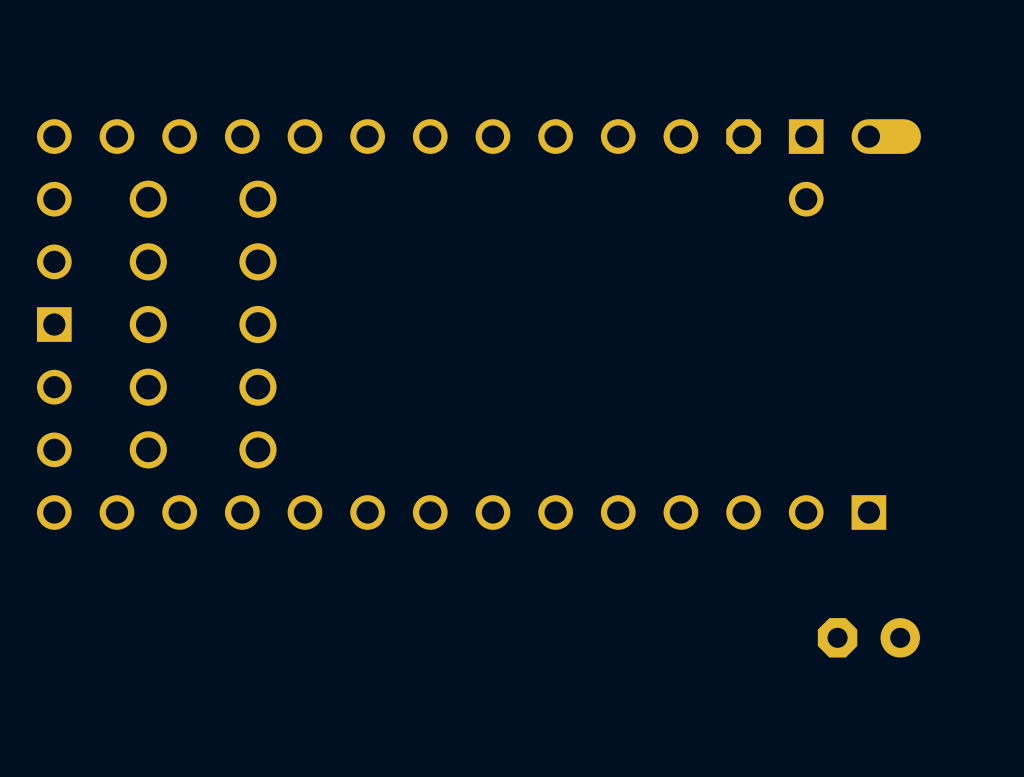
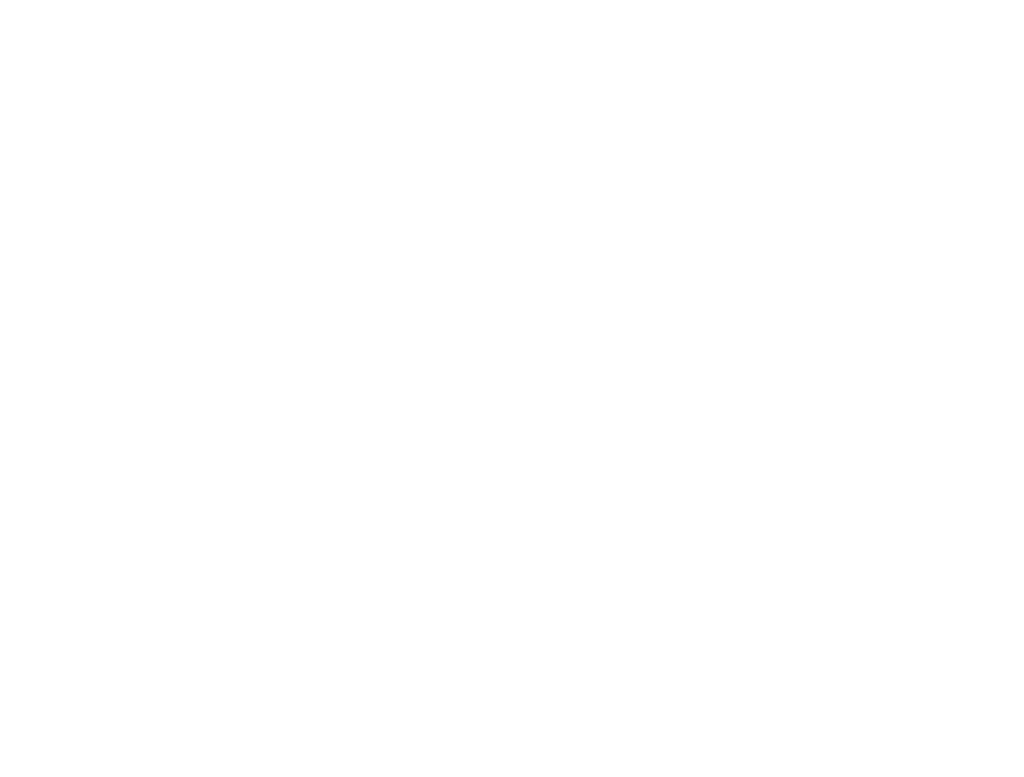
part: (478, 324) -> none
part: (868, 637) -> none

